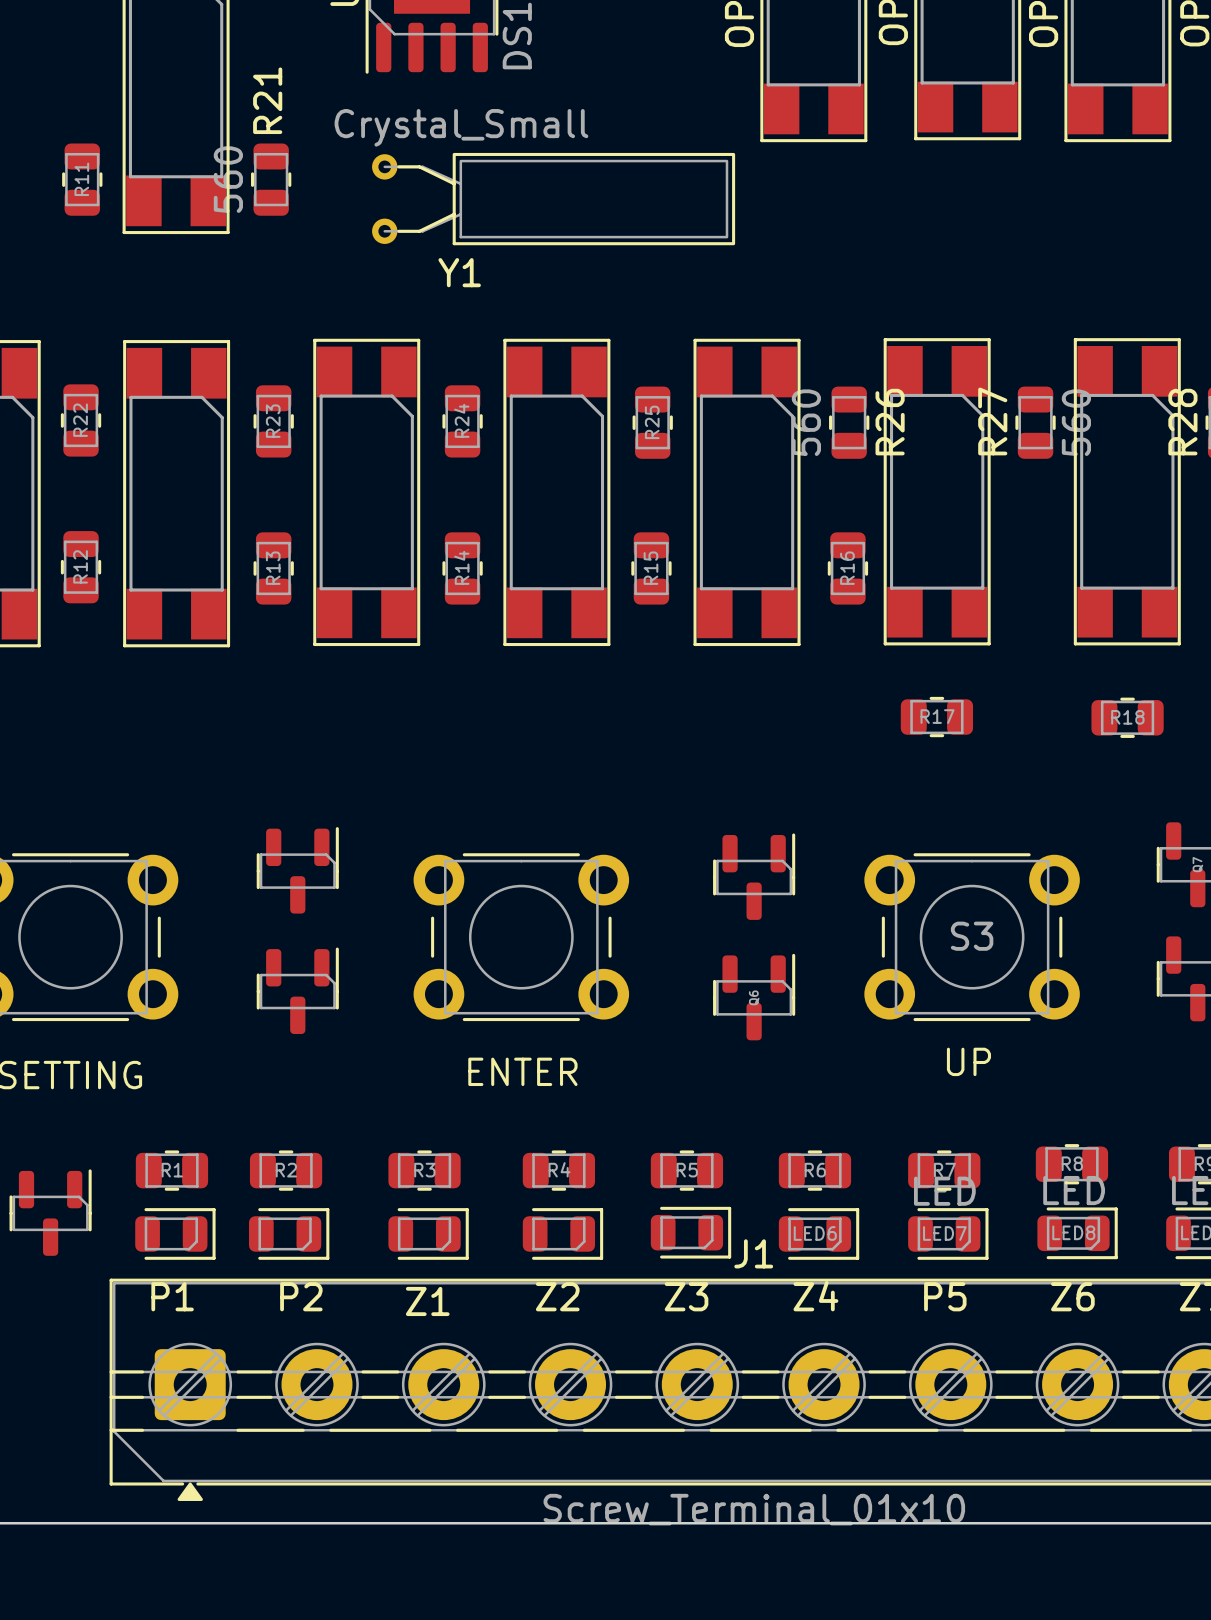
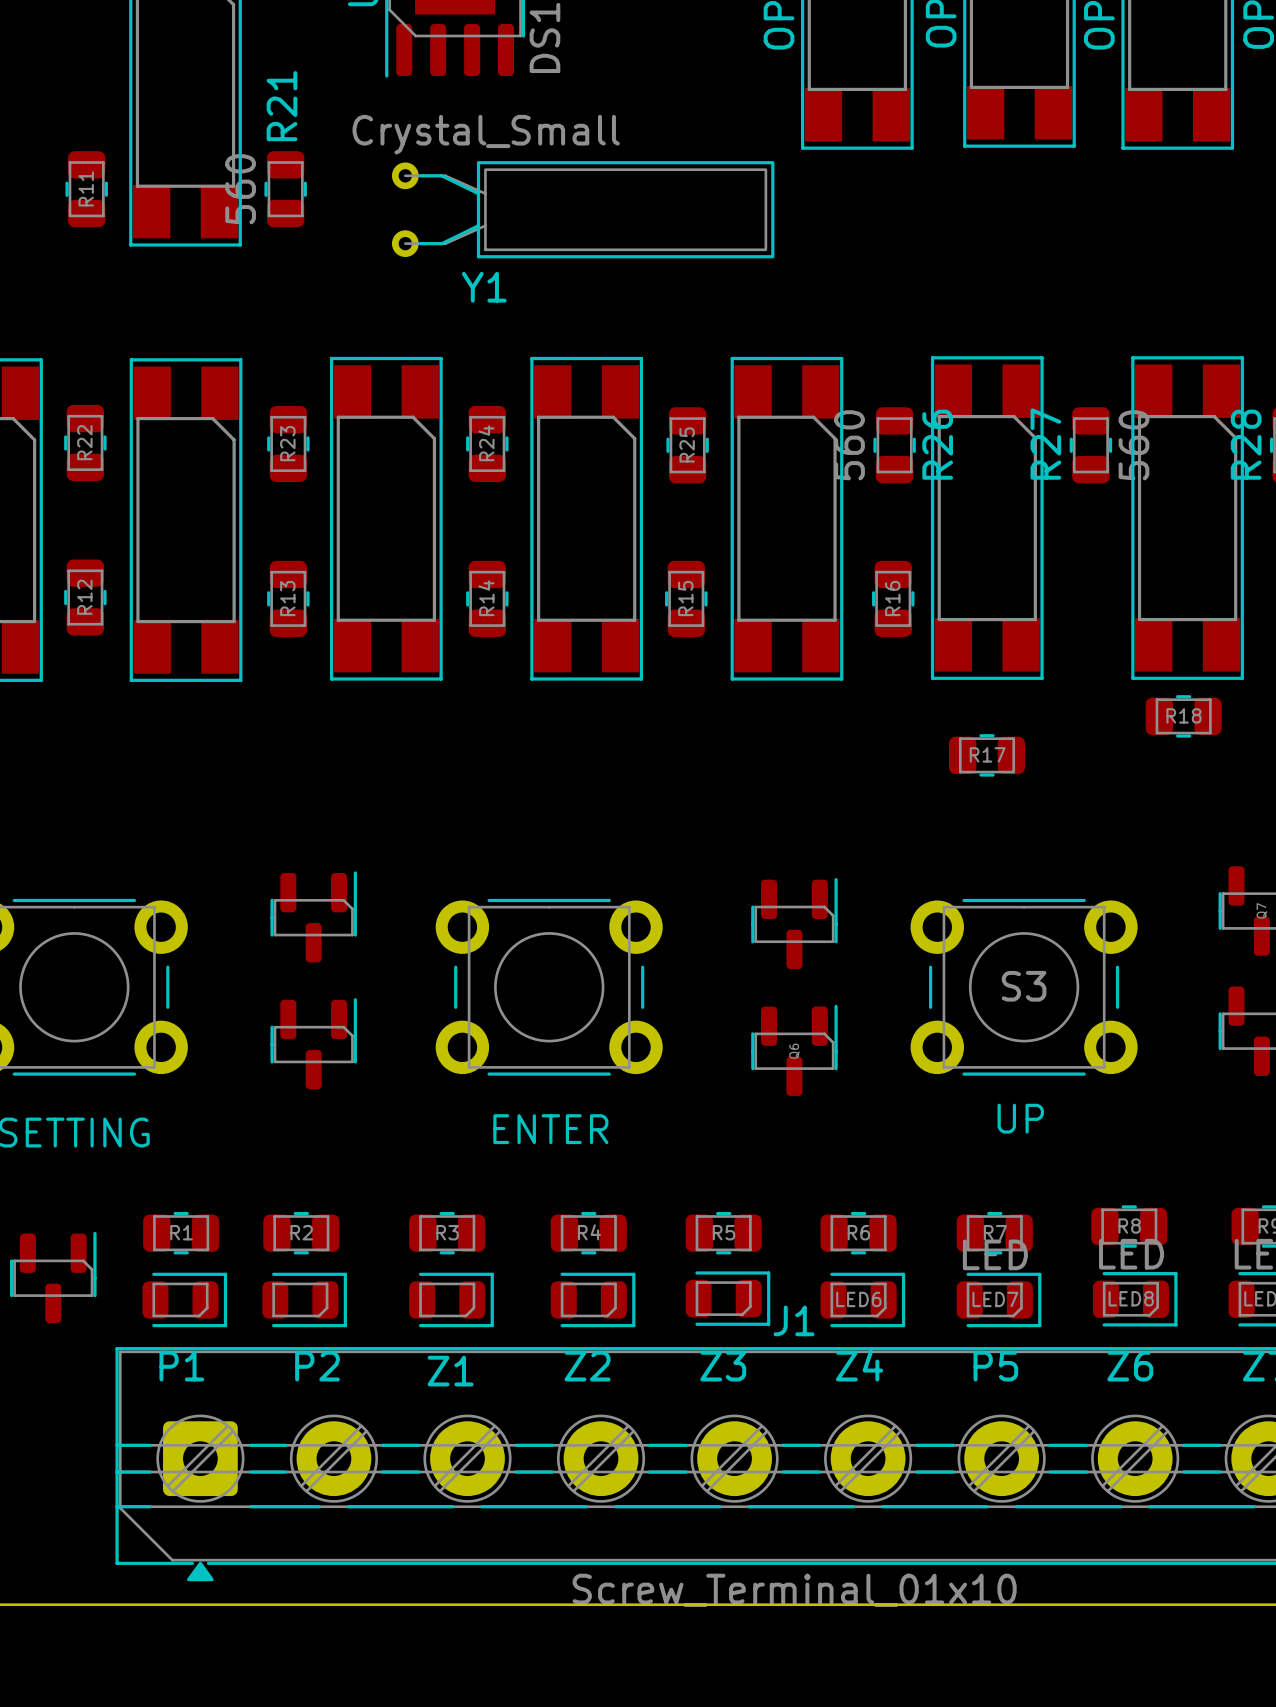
R18 position: (1127, 717) -> (1183, 716)

